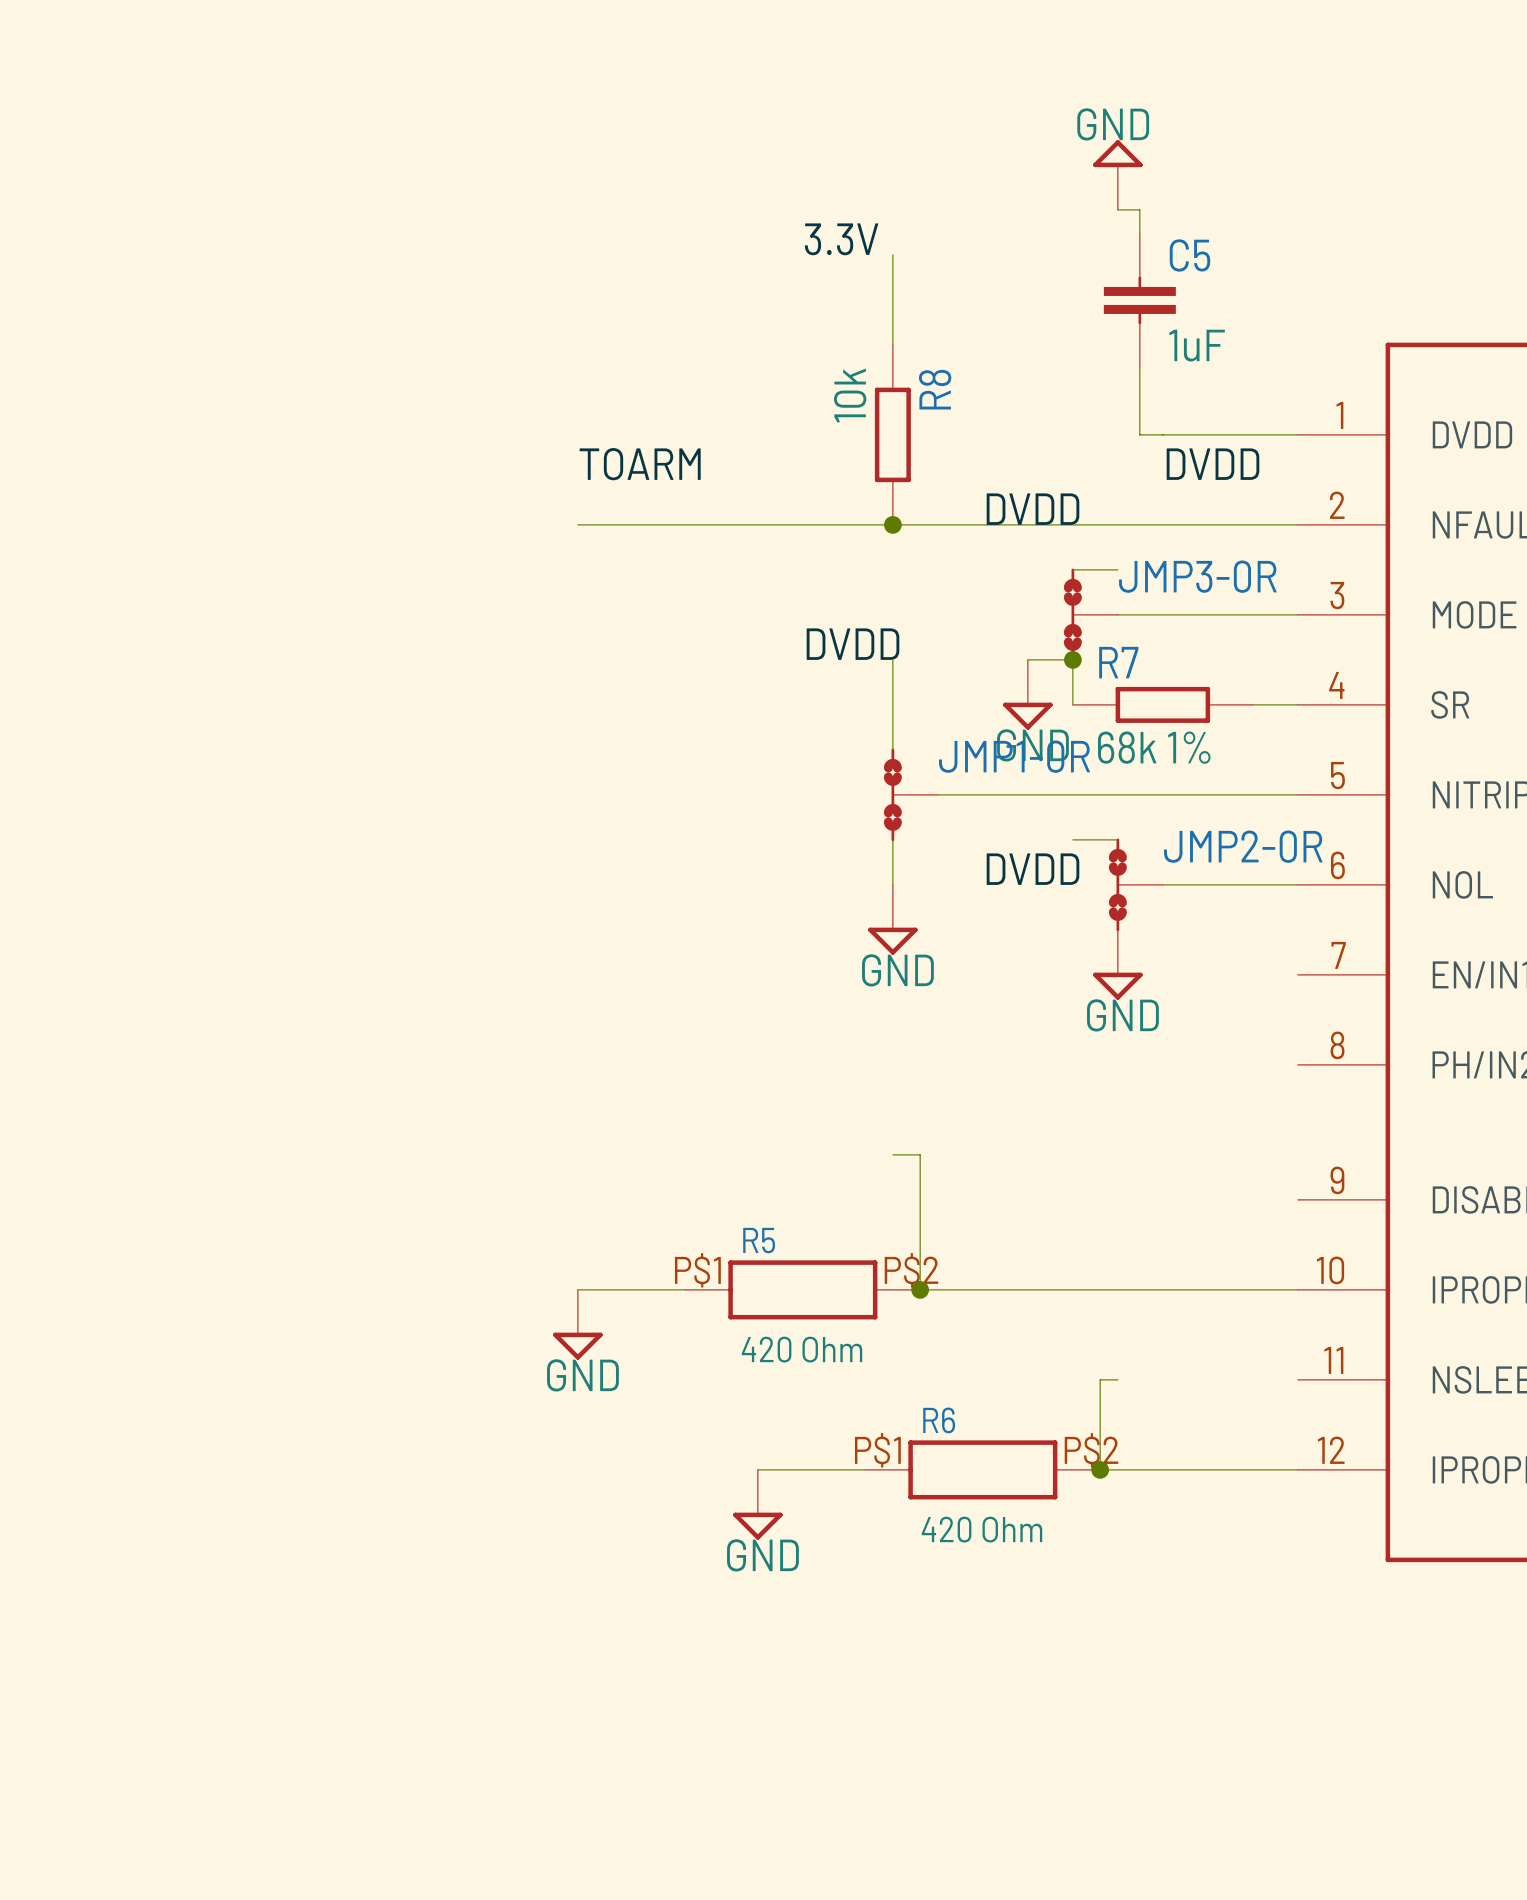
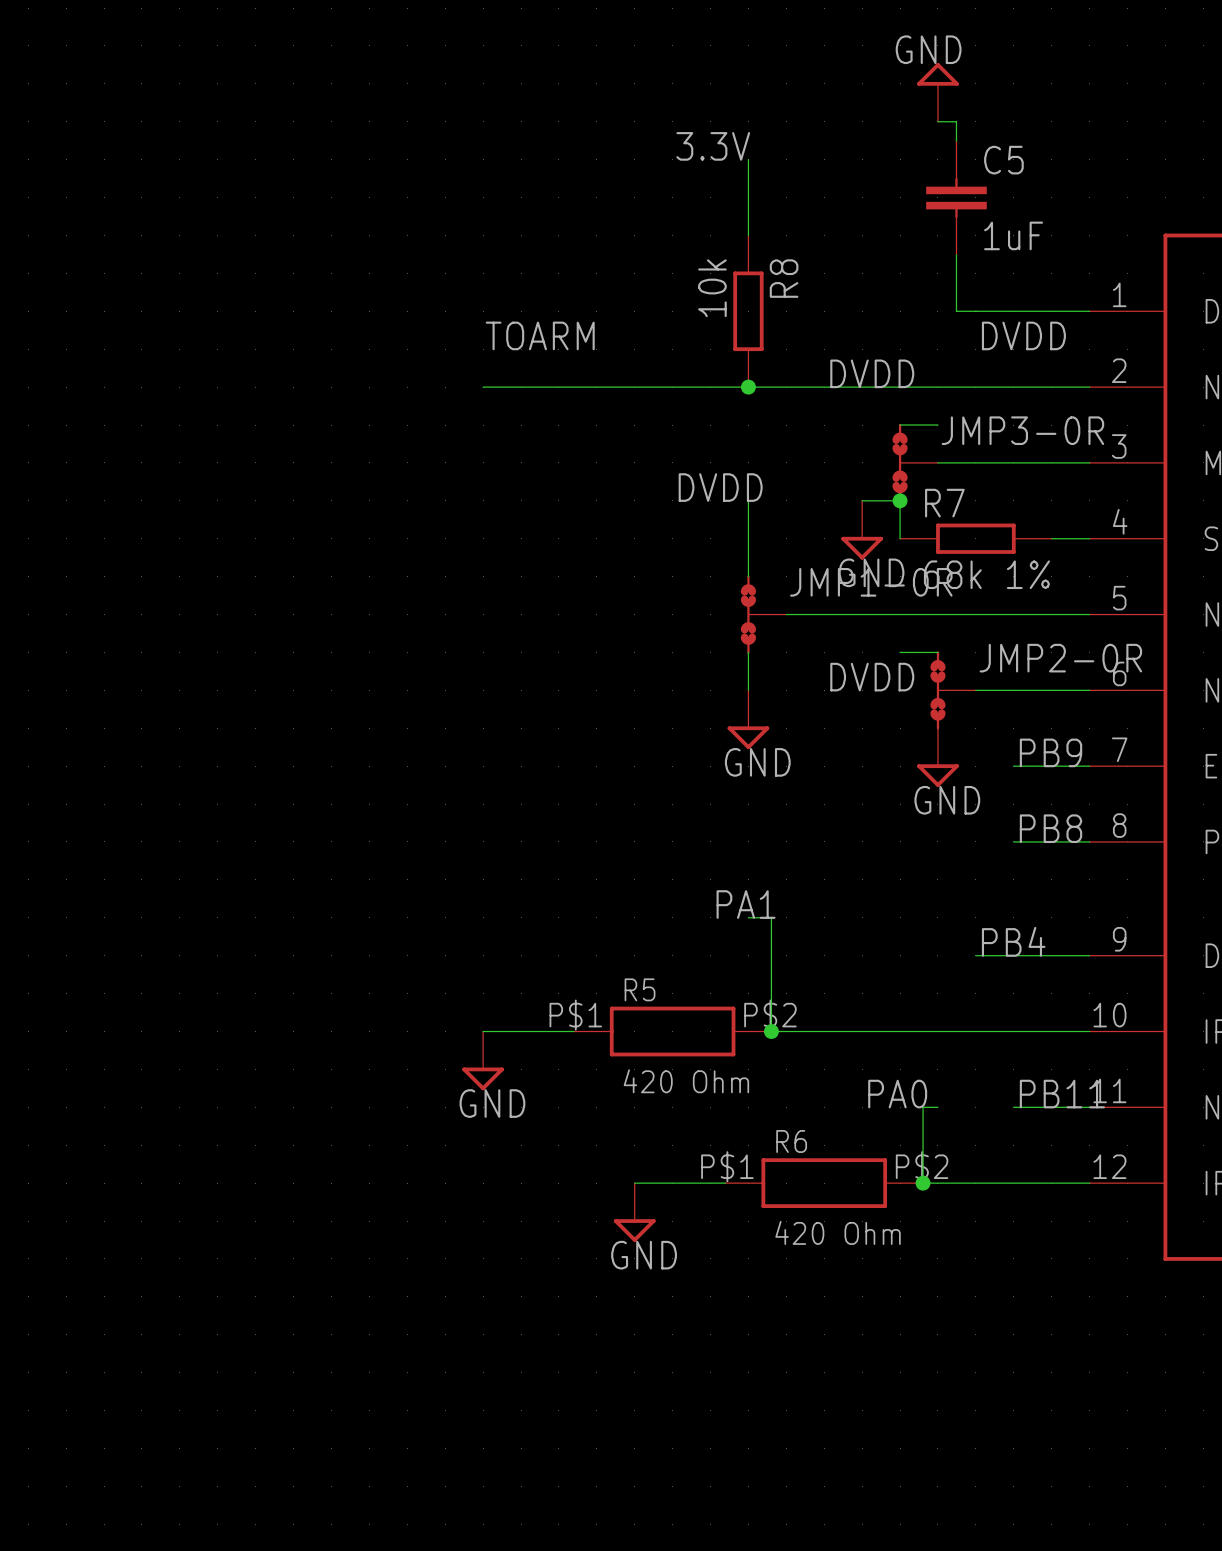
label: none -> PB9 (1051, 752)
wire: none -> (1013, 766) (1089, 766)
label: none -> PB8 (1051, 828)
wire: none -> (1013, 841) (1089, 841)
label: none -> PA1 (746, 904)
label: none -> PB4 (1013, 941)
wire: none -> (975, 955) (1089, 955)
label: none -> PA0 (897, 1094)
label: none -> PB11 (1062, 1094)
wire: none -> (1013, 1107) (1089, 1107)

